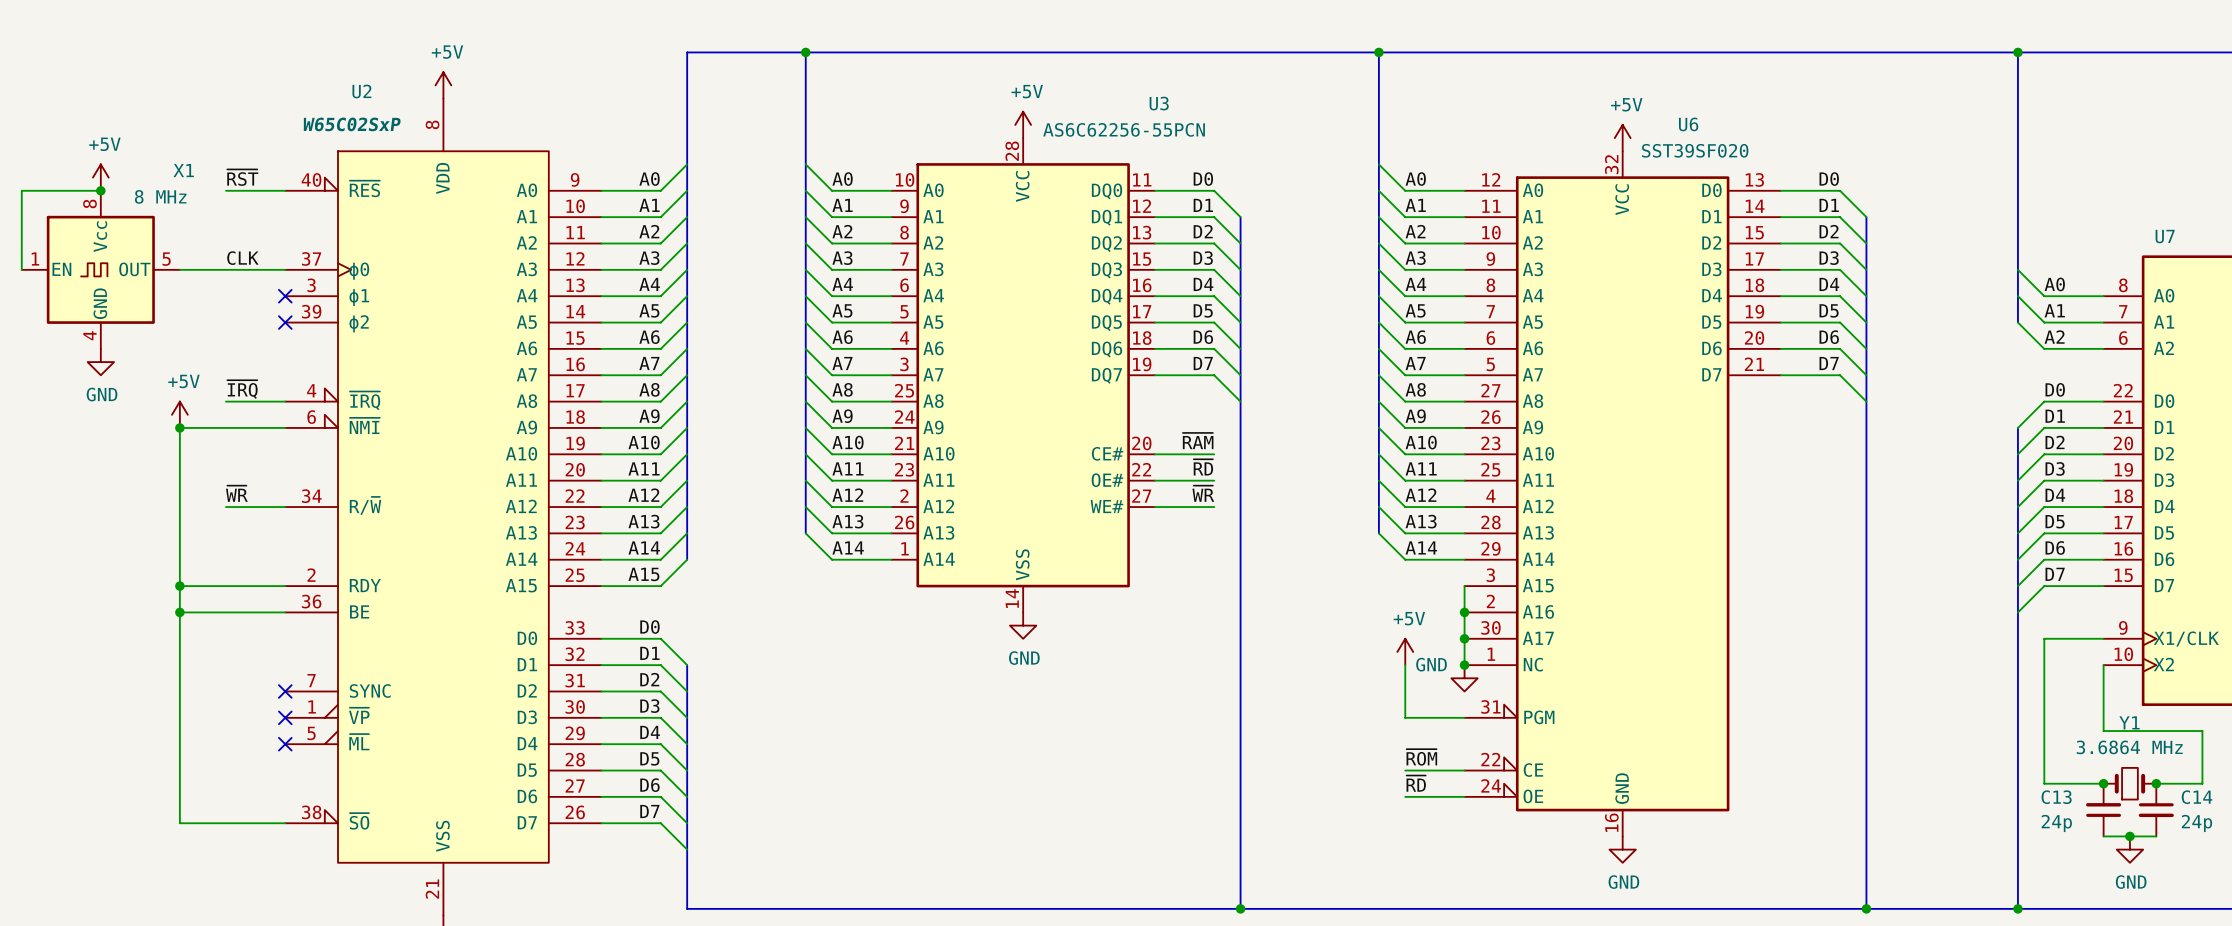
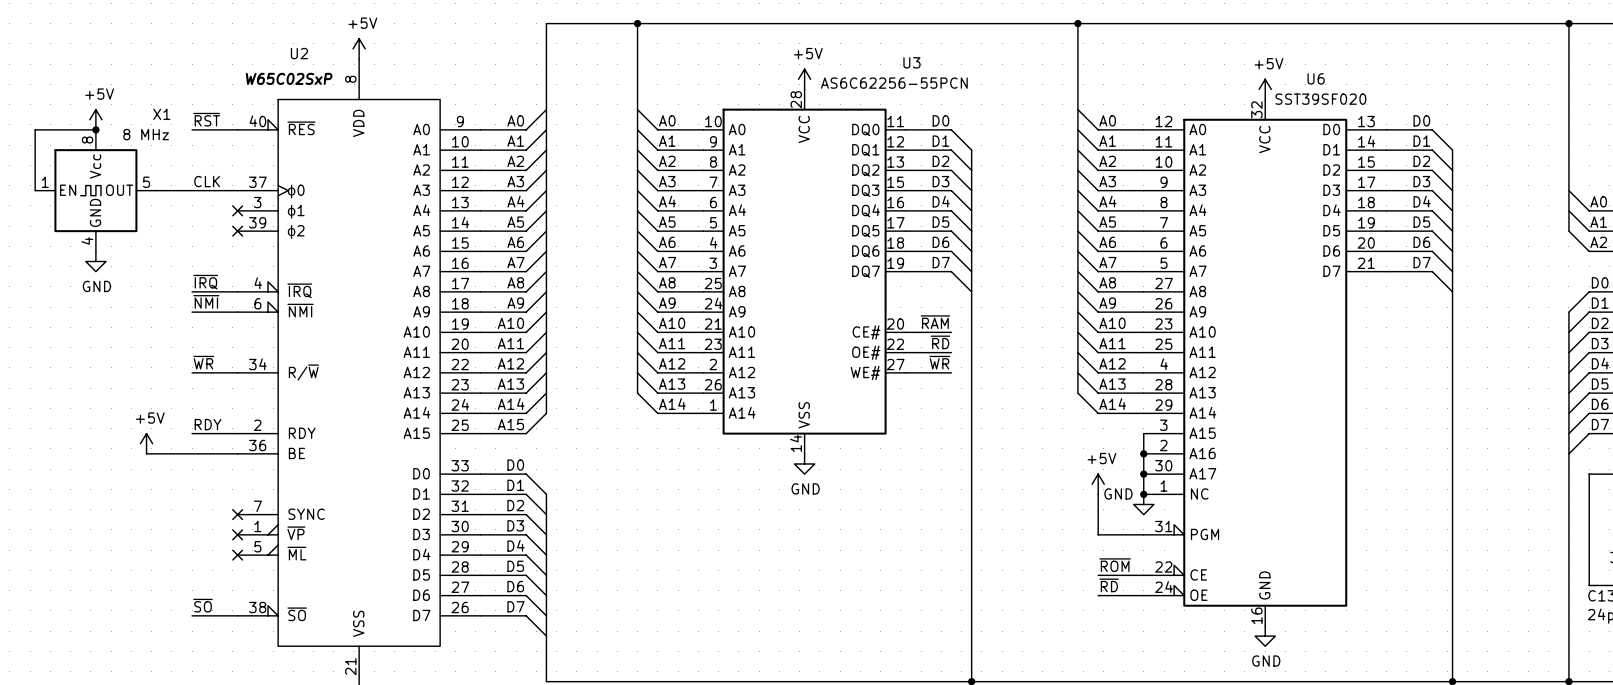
power symbol position: +5V (179, 414) -> +5V (146, 443)
label: none -> ~{NMI} (206, 301)
junction: (179, 427) -> none
wire: (226, 427) (179, 427) (179, 823) (226, 823) -> none
label: none -> RDY (208, 424)
wire: (179, 586) (226, 586) -> none
junction: (179, 586) -> none
wire: none -> (146, 453) (156, 453)
junction: (179, 612) -> none
label: none -> ~{SO} (203, 605)

